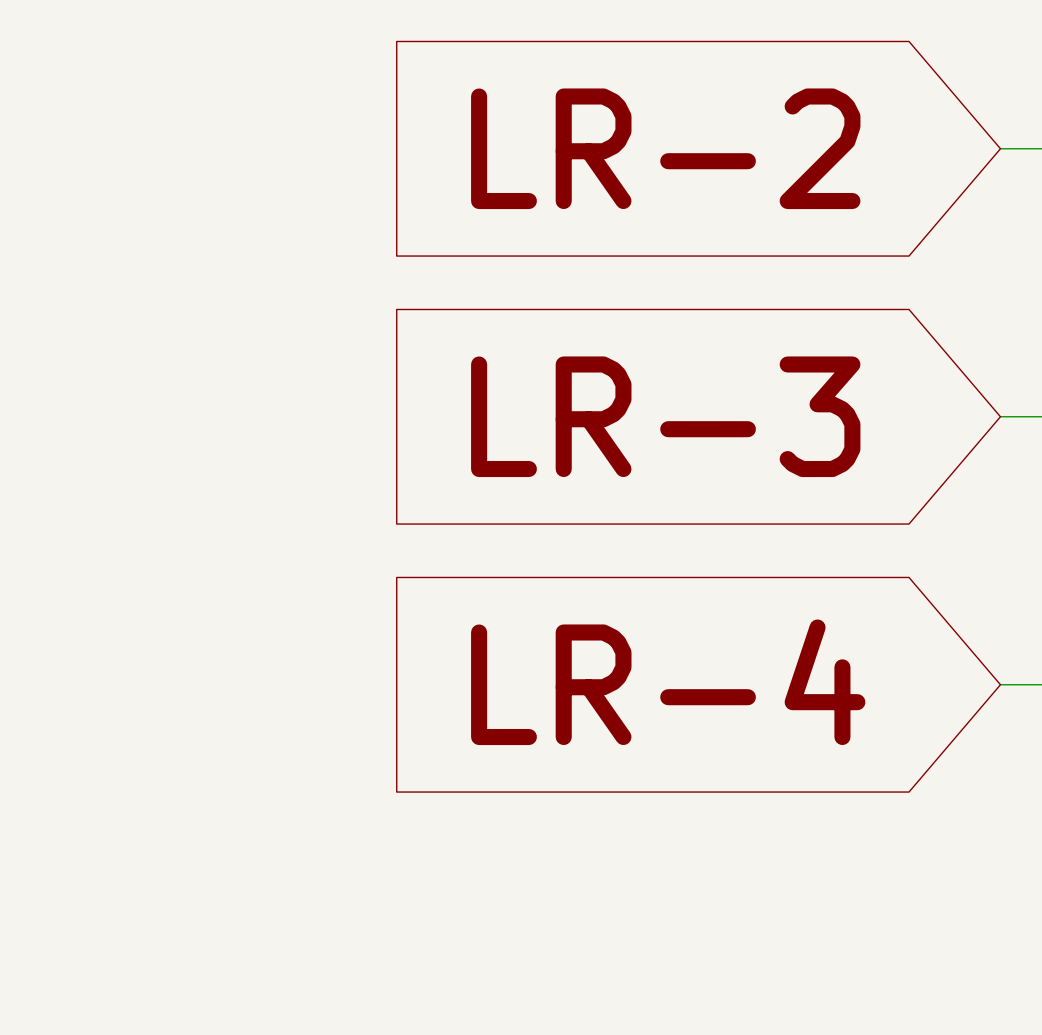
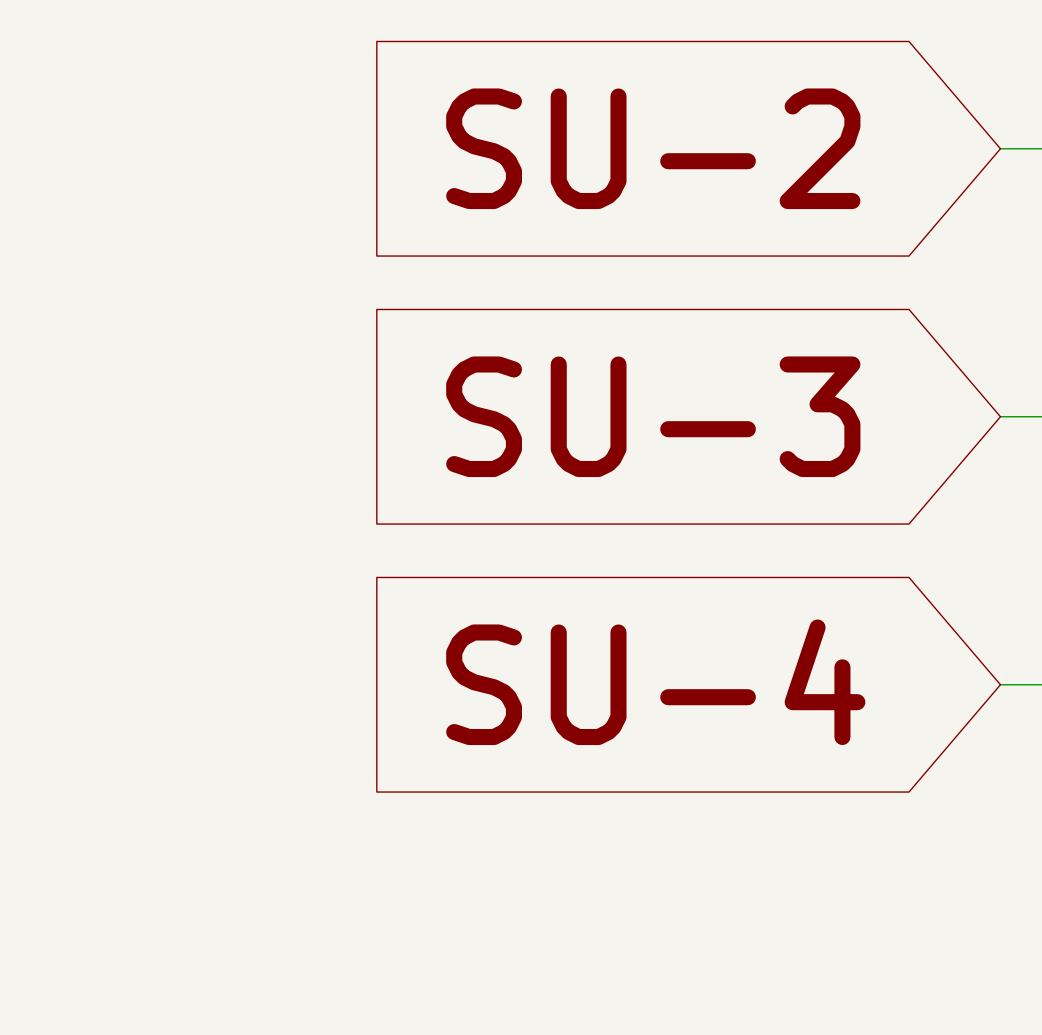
global label: LR-2 (665, 148) -> SU-2 (653, 148)
global label: LR-3 (665, 416) -> SU-3 (653, 416)
global label: LR-4 (668, 682) -> SU-4 (655, 682)

